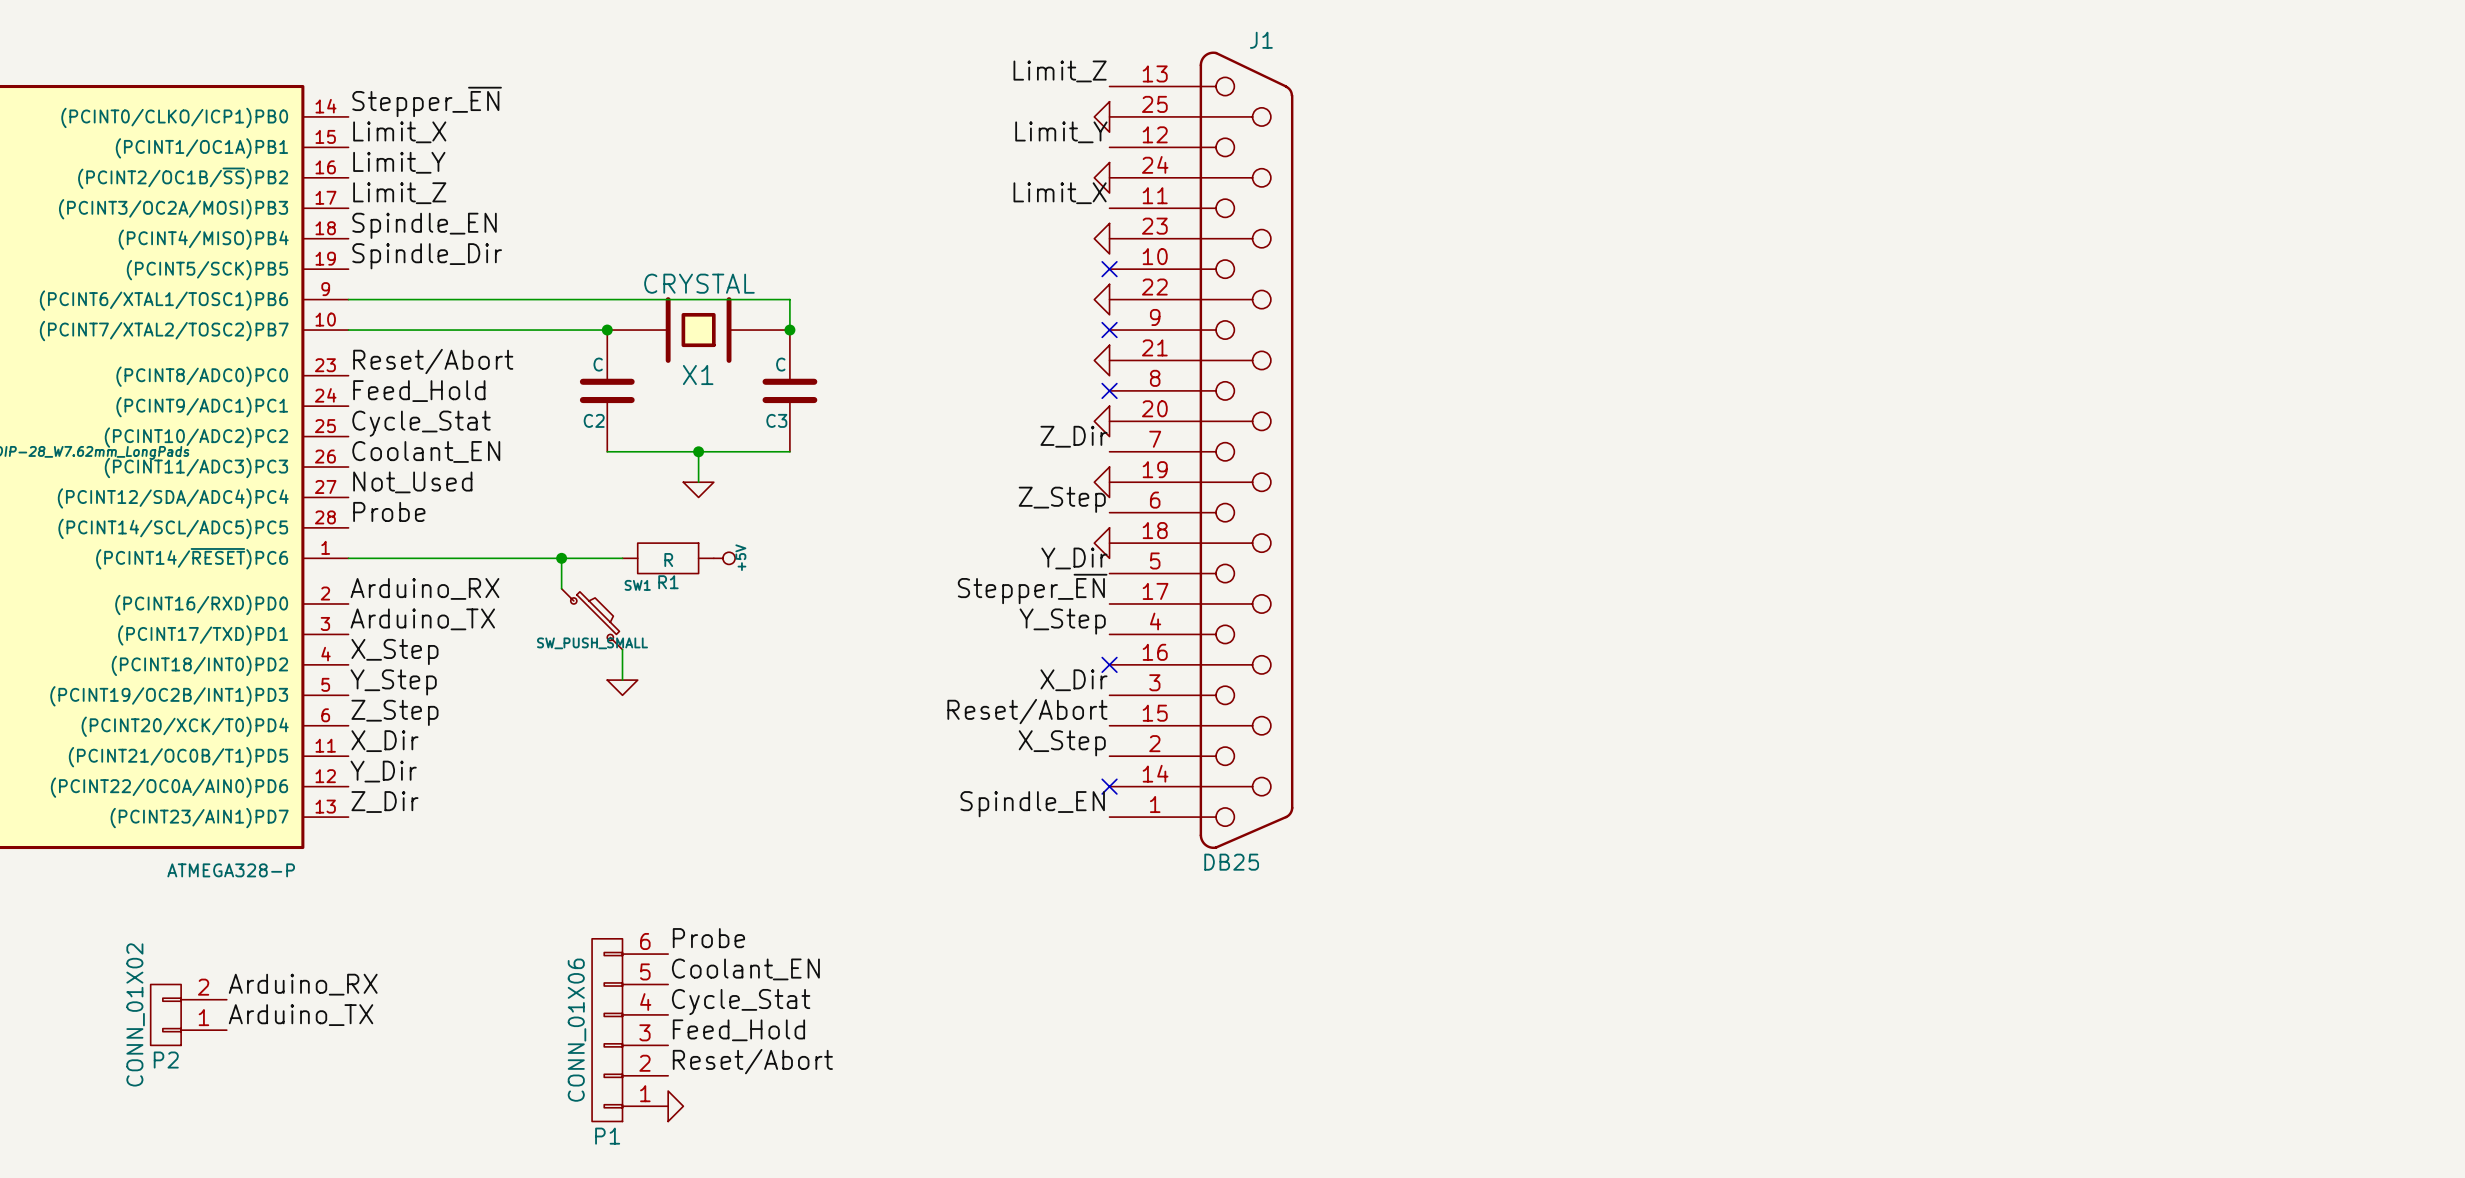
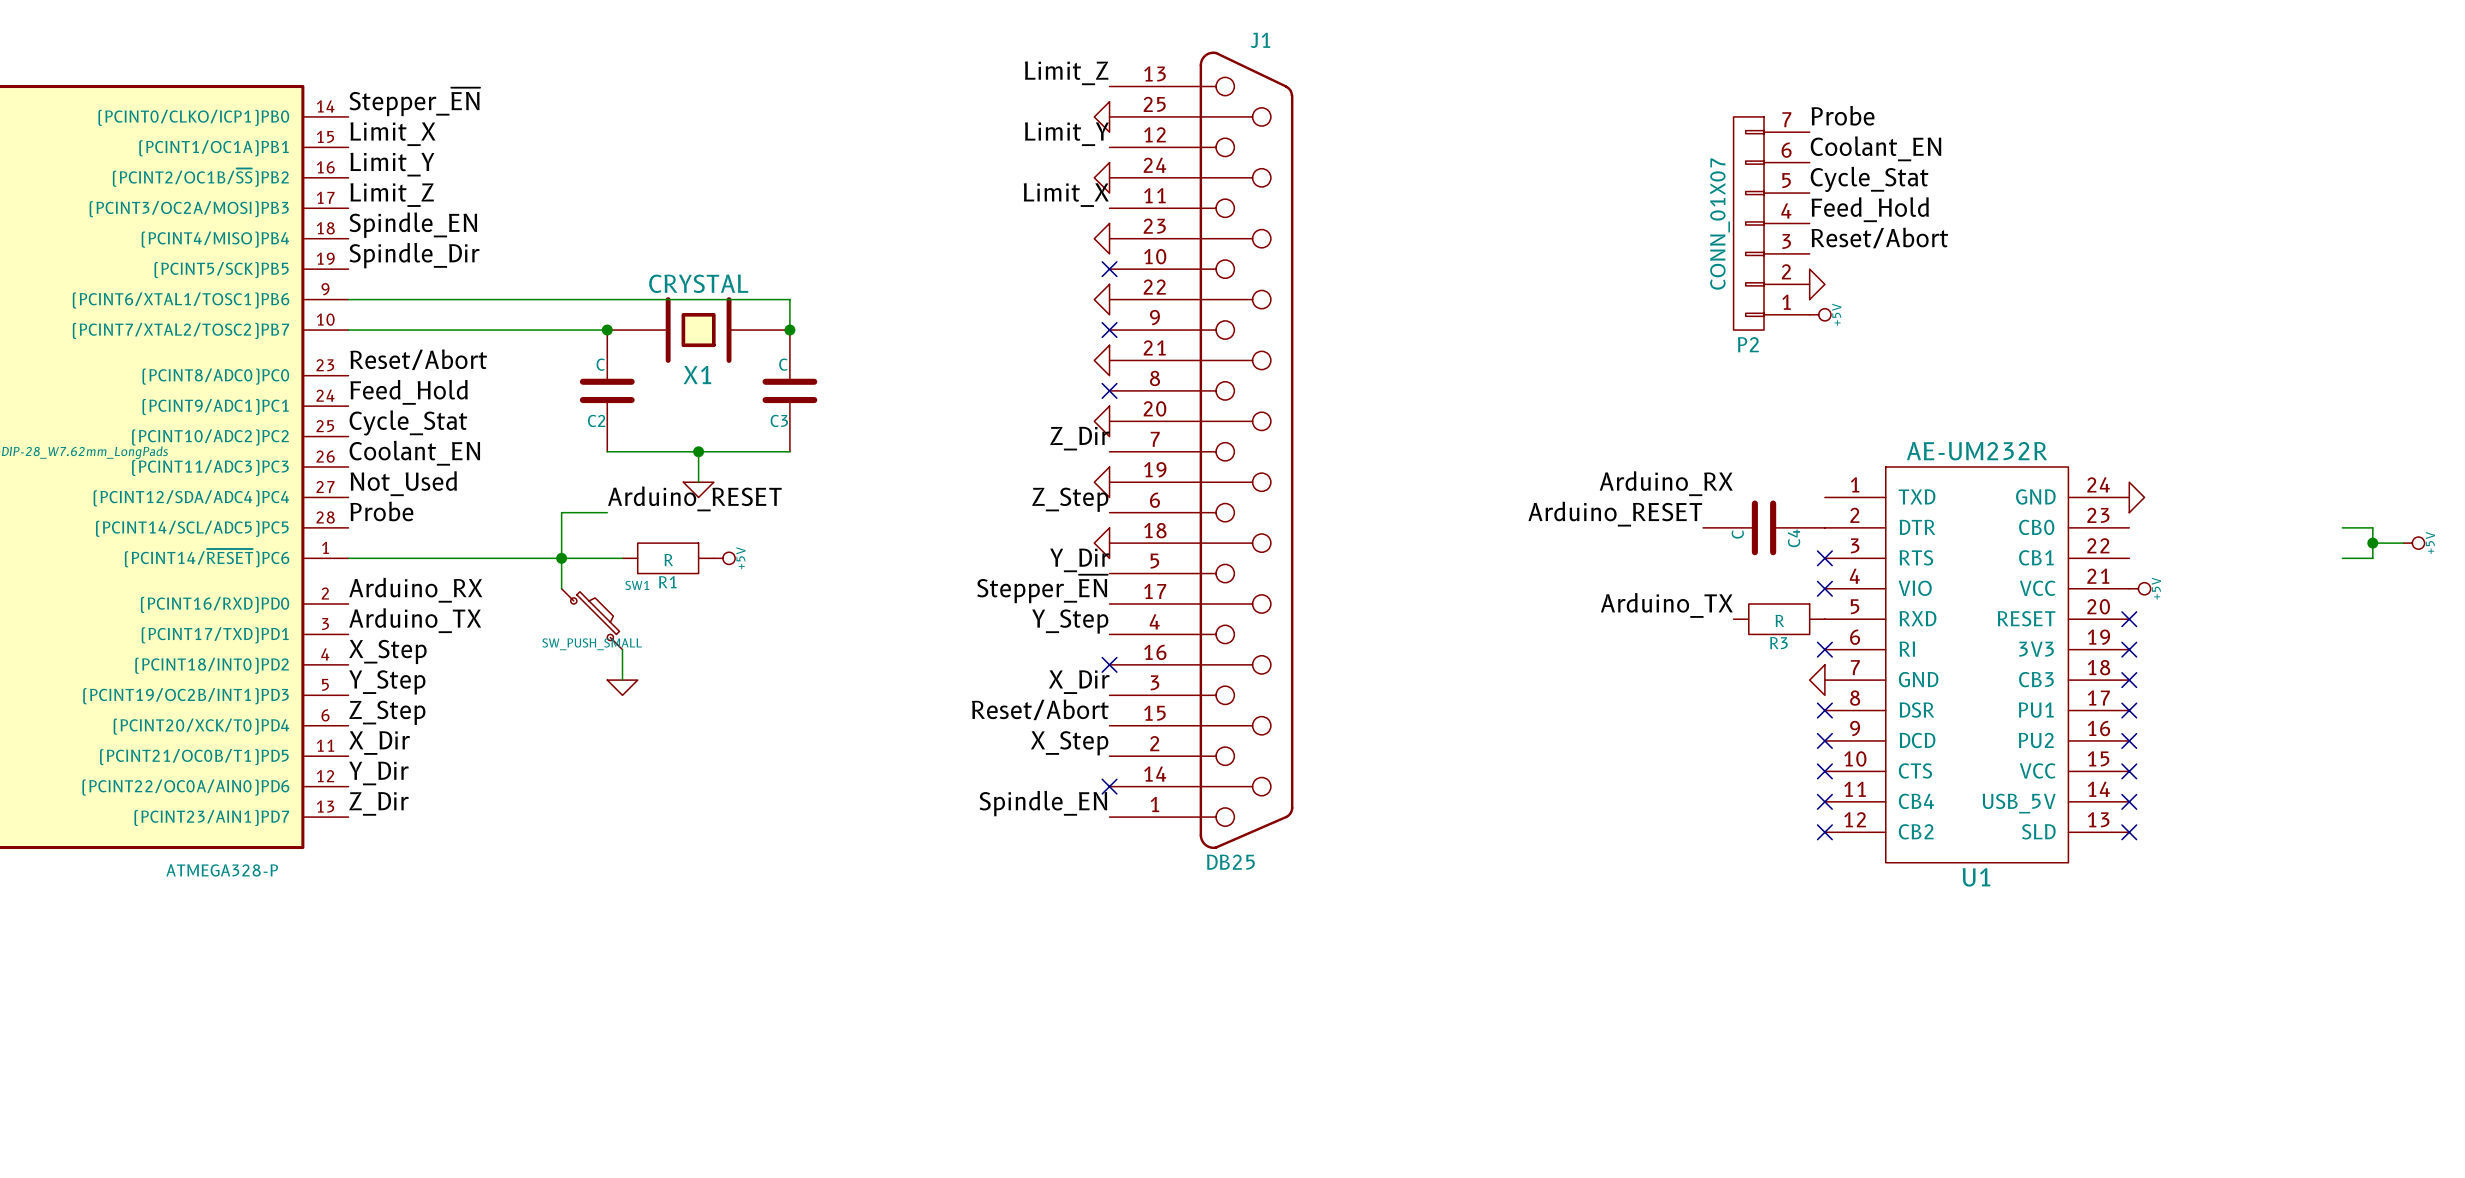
label: none -> Probe (1842, 115)
label: none -> Coolant_EN (1875, 148)
label: none -> Cycle_Stat (1869, 179)
label: none -> Feed_Hold (1870, 209)
label: none -> Reset/Abort (1879, 237)
power symbol: none -> (1817, 284)
power symbol: none -> +5V (1820, 314)
label: none -> Arduino_RX (1666, 483)
label: none -> Arduino_RESET (694, 498)
power symbol: none -> (2136, 497)
wire: none -> (607, 512) (561, 512) (561, 558)
label: none -> Arduino_RESET (1615, 514)
C4: none -> C (1764, 527)
wire: none -> (2342, 527) (2372, 527) (2372, 558) (2342, 558)
wire: none -> (2372, 543) (2403, 543)
junction: none -> (2372, 543)
power symbol: none -> +5V (2413, 543)
no-connect mark: none -> (1824, 558)
no-connect mark: none -> (1824, 588)
power symbol: none -> +5V (2139, 588)
label: none -> Arduino_TX (1666, 605)
R3: none -> R (1779, 619)
no-connect mark: none -> (2129, 619)
no-connect mark: none -> (1824, 649)
no-connect mark: none -> (2129, 649)
U1: none -> AE-UM232R (1977, 664)
power symbol: none -> (1817, 680)
no-connect mark: none -> (2129, 680)
no-connect mark: none -> (1824, 710)
no-connect mark: none -> (2129, 710)
no-connect mark: none -> (1824, 740)
no-connect mark: none -> (2129, 740)
no-connect mark: none -> (1824, 771)
no-connect mark: none -> (2129, 771)
no-connect mark: none -> (1824, 801)
no-connect mark: none -> (2129, 801)
no-connect mark: none -> (1824, 832)
no-connect mark: none -> (2129, 832)
label: Probe (708, 938) -> none
label: Coolant_EN (745, 969) -> none
P2 symbol: [150, 984, 227, 1046] -> [1733, 116, 1810, 331]
label: Arduino_RX (303, 984) -> none
label: Cycle_Stat (741, 1002) -> none
P2 value: CONN_01X02 (135, 1014) -> CONN_01X07 (1720, 224)
label: Arduino_TX (301, 1015) -> none
P1: CONN_01X06 (630, 1030) -> none
label: Feed_Hold (738, 1030) -> none
P2 name position: P2 (166, 1060) -> P2 (1748, 344)
label: Reset/Abort (752, 1061) -> none
power symbol: (675, 1106) -> none

